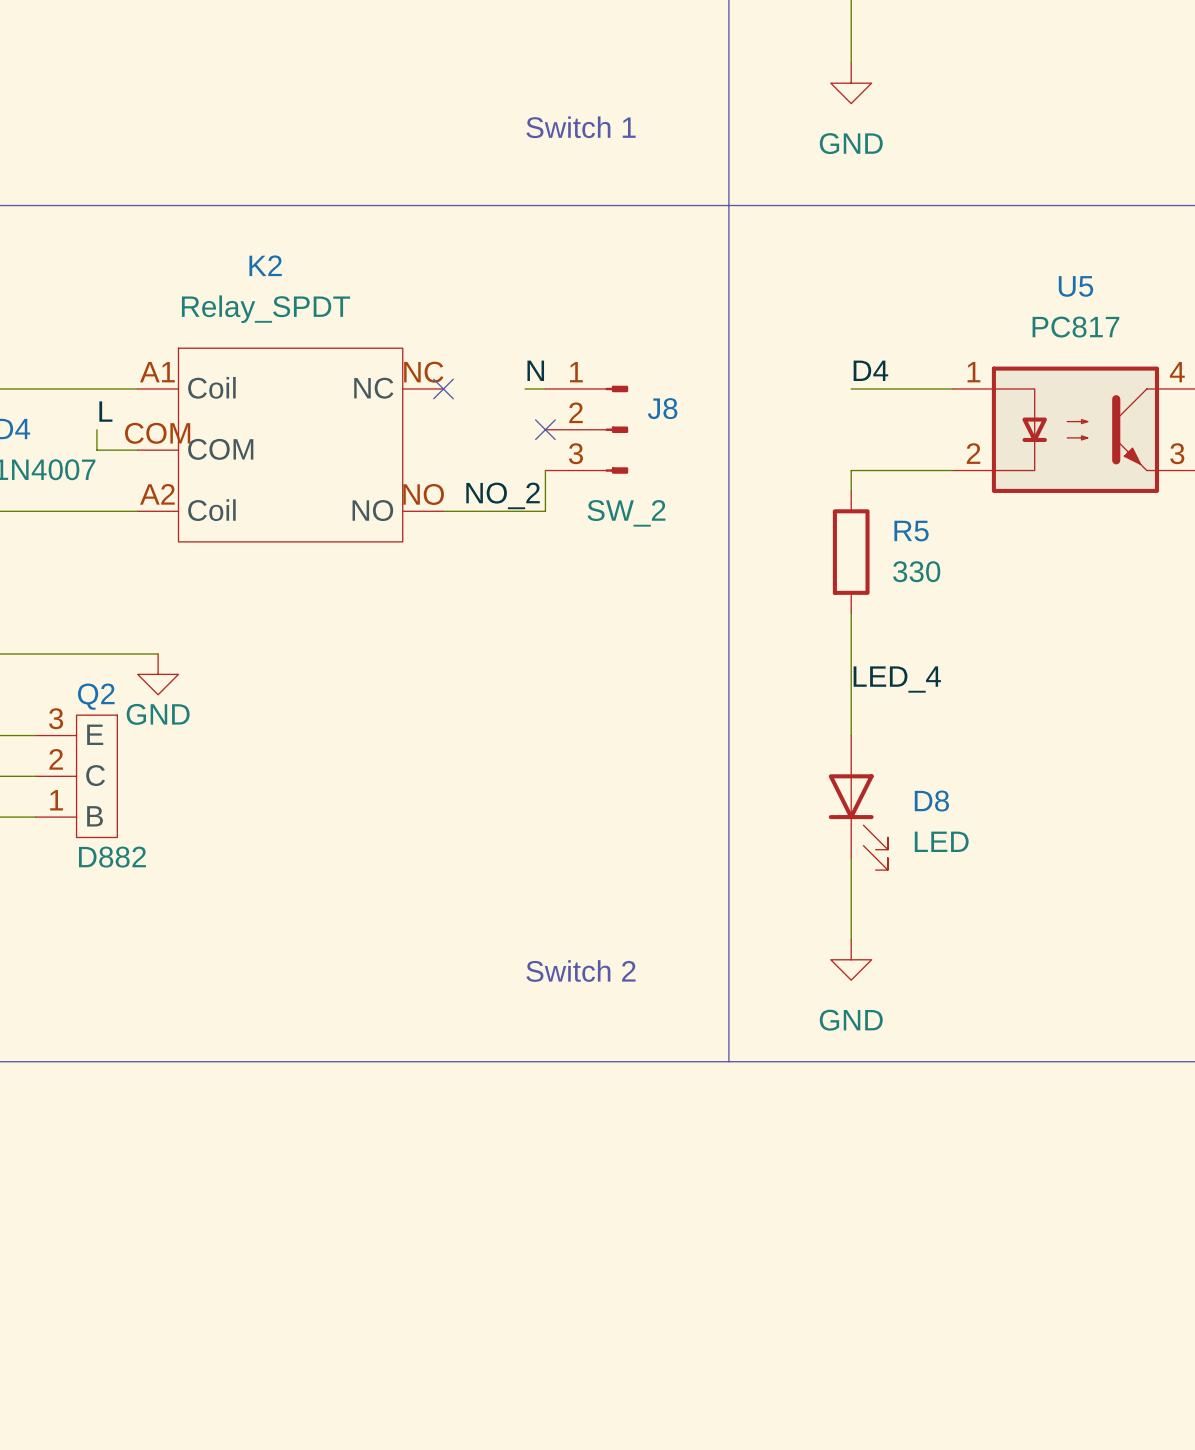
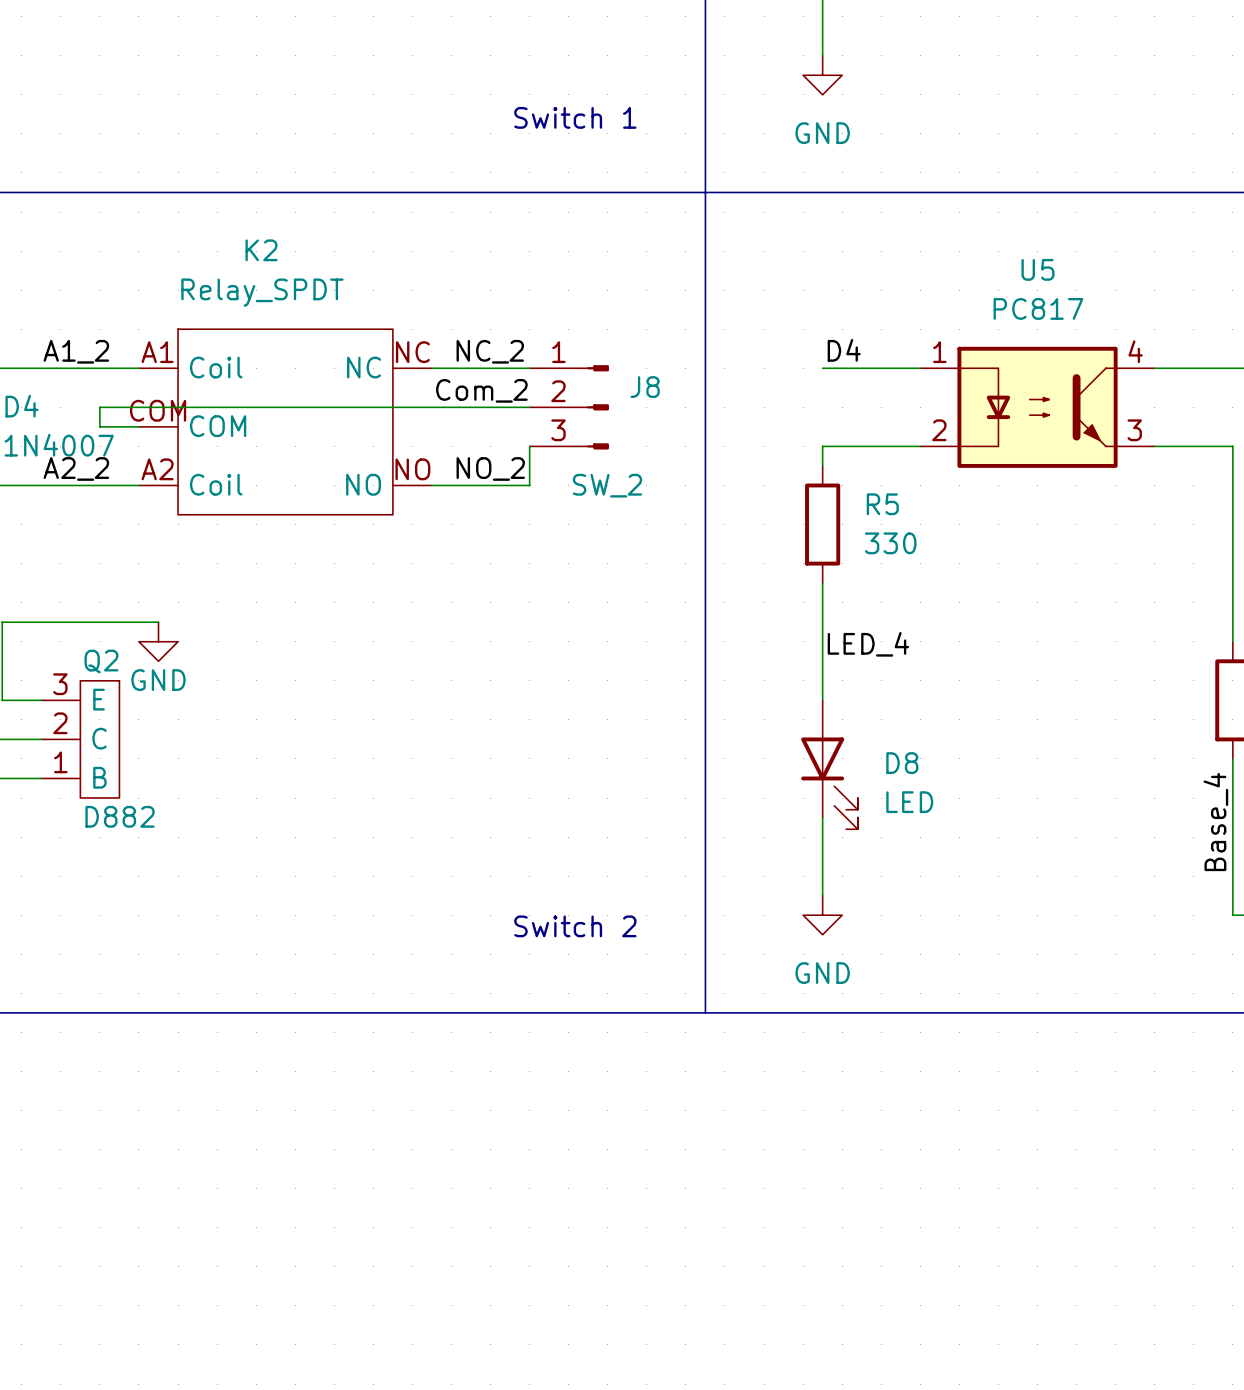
label: N (535, 370) -> none
label: none -> A1_2 (76, 351)
label: none -> NC_2 (490, 351)
wire: none -> (431, 368) (510, 368)
no-connect mark: (443, 388) -> none
label: L (105, 411) -> none
label: none -> Com_2 (481, 390)
wire: none -> (99, 407) (529, 407)
no-connect mark: (545, 429) -> none
label: none -> A2_2 (76, 468)

